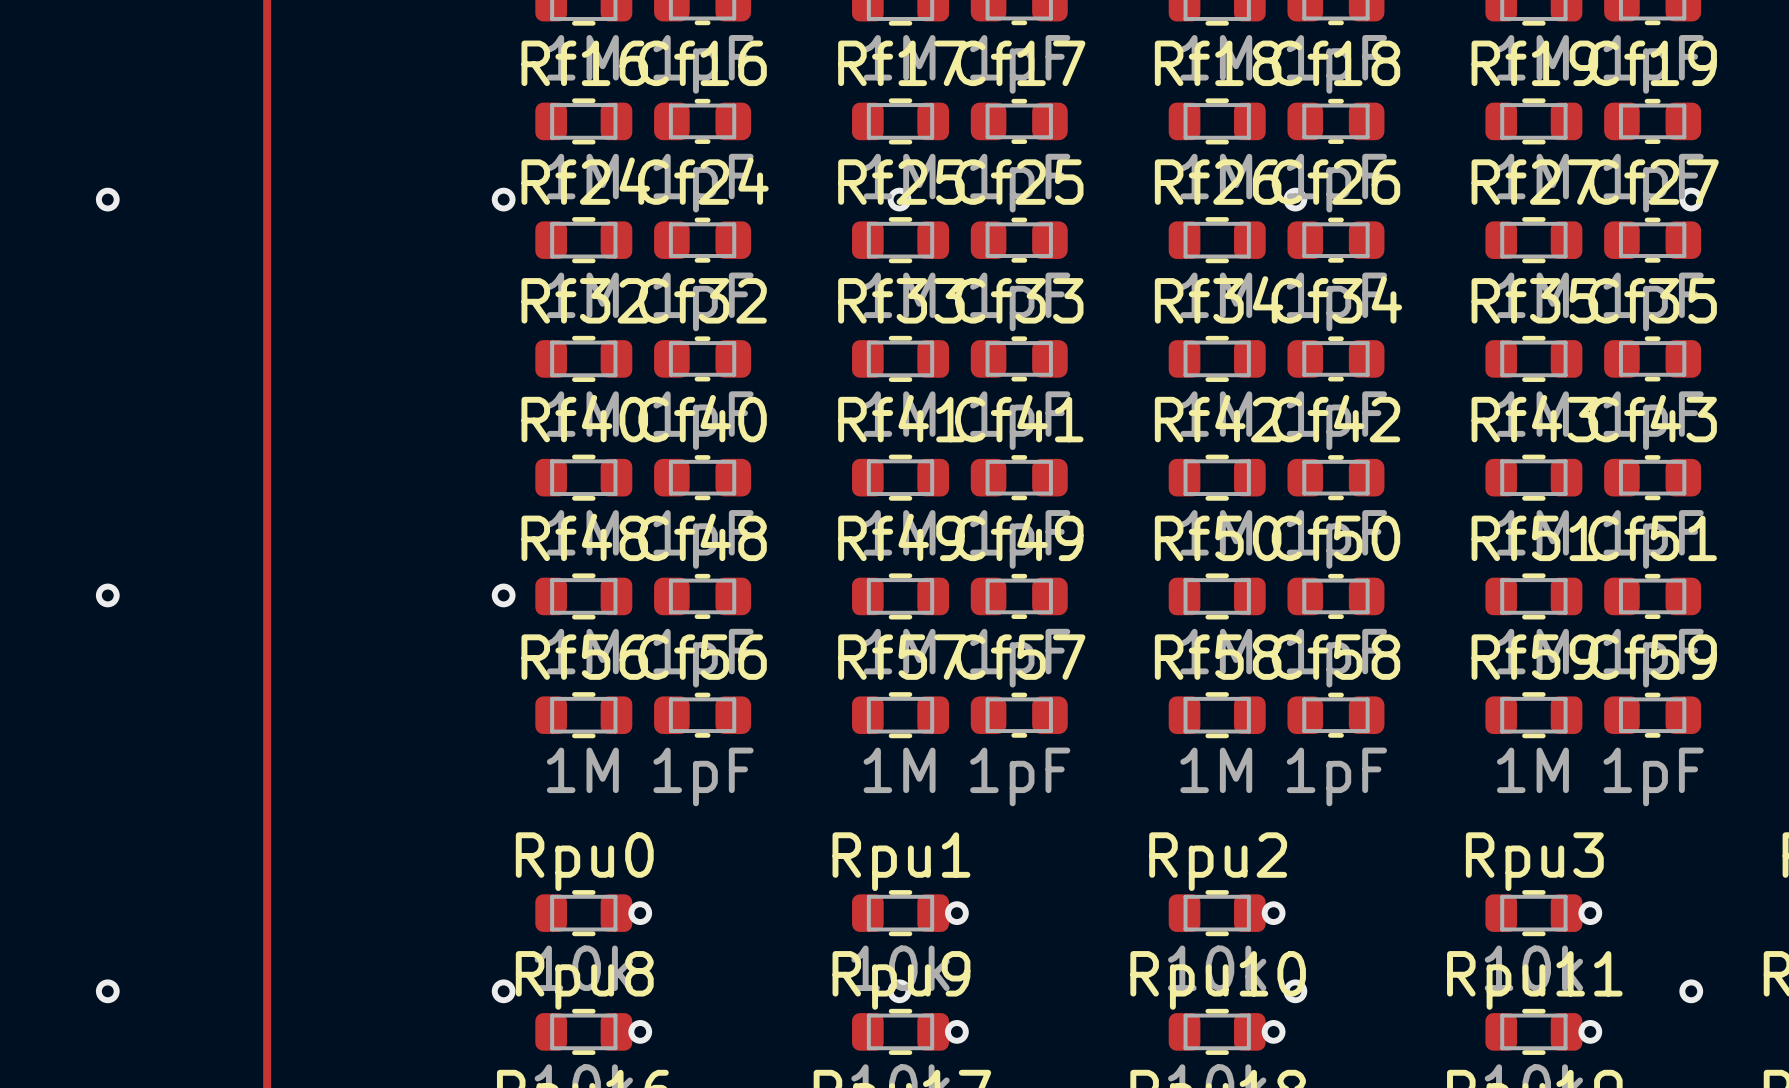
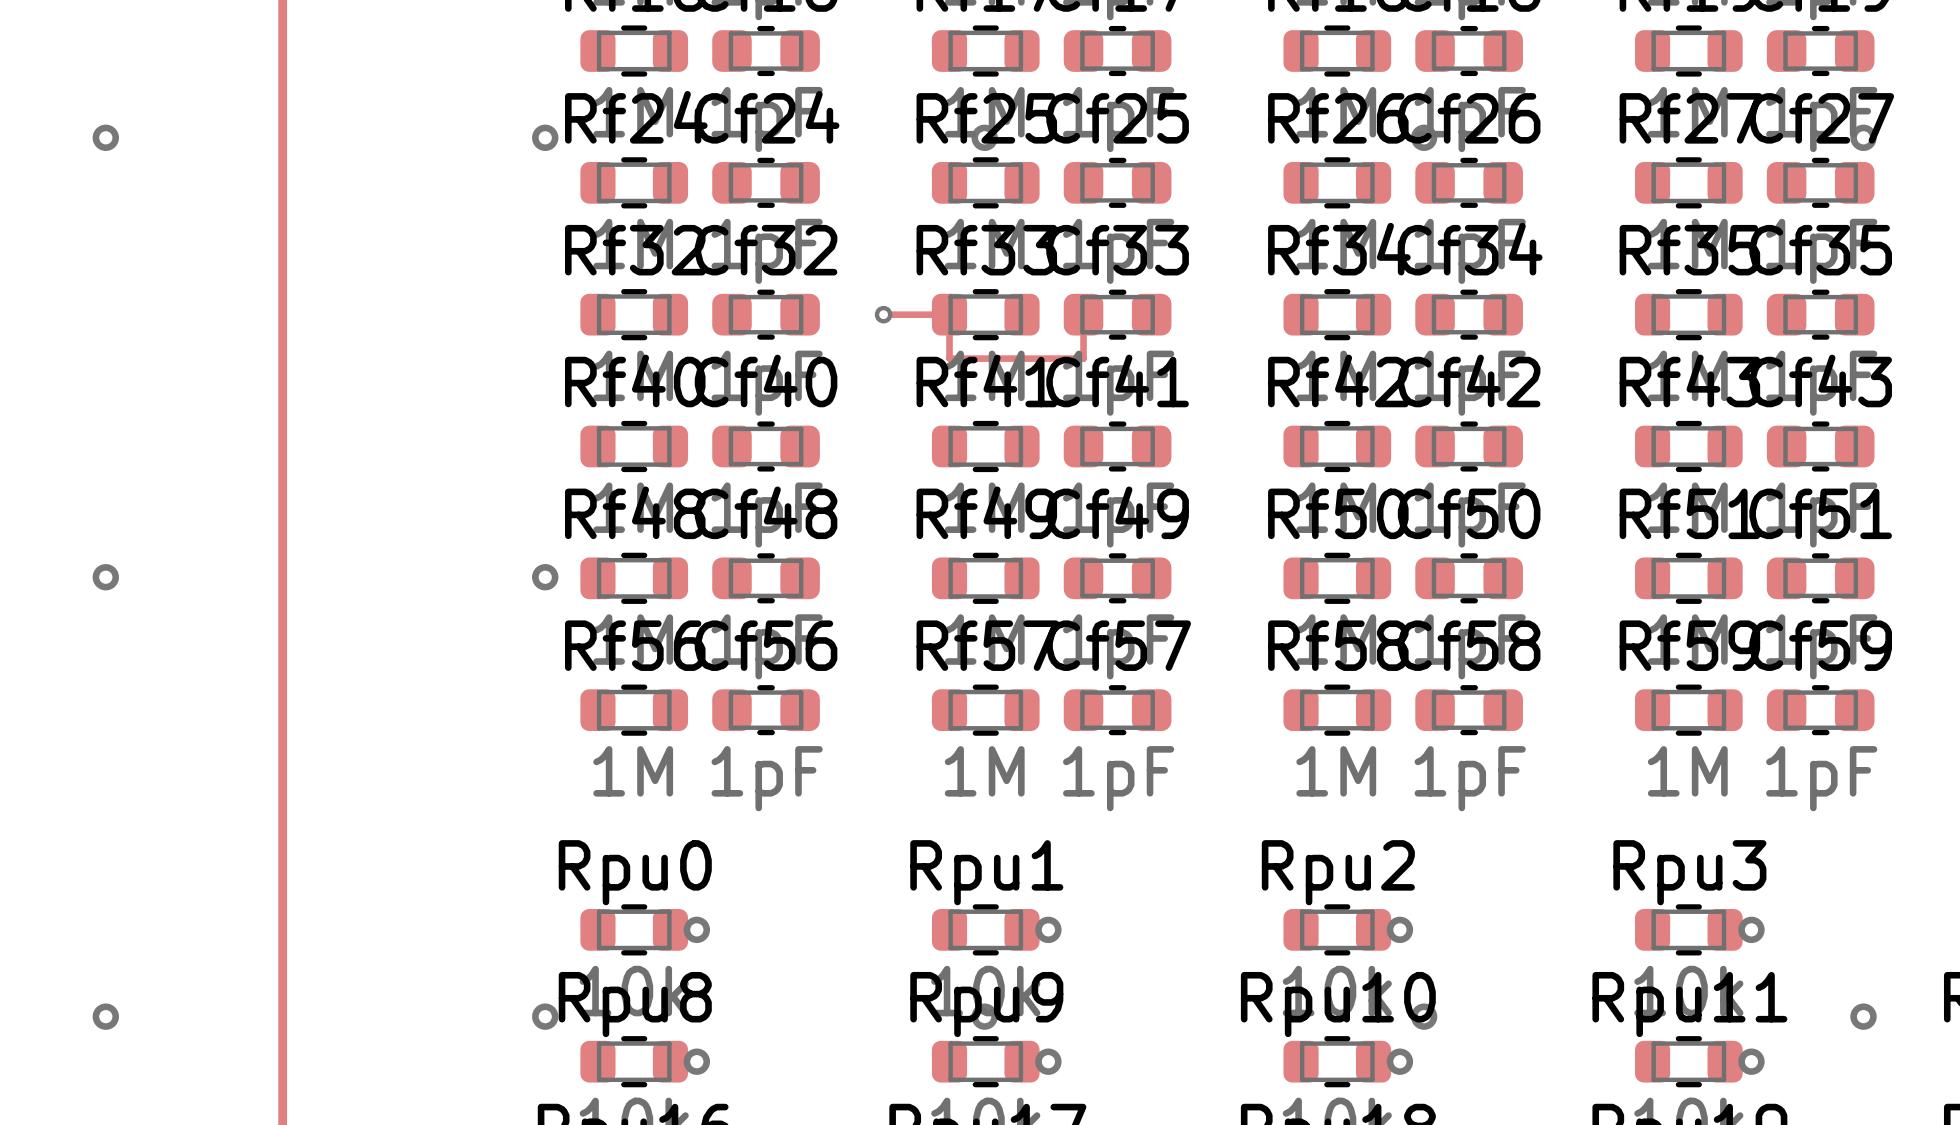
track: none -> (883, 314) (949, 314) (949, 358) (1083, 358) (1083, 314)
via: none -> (883, 314)

